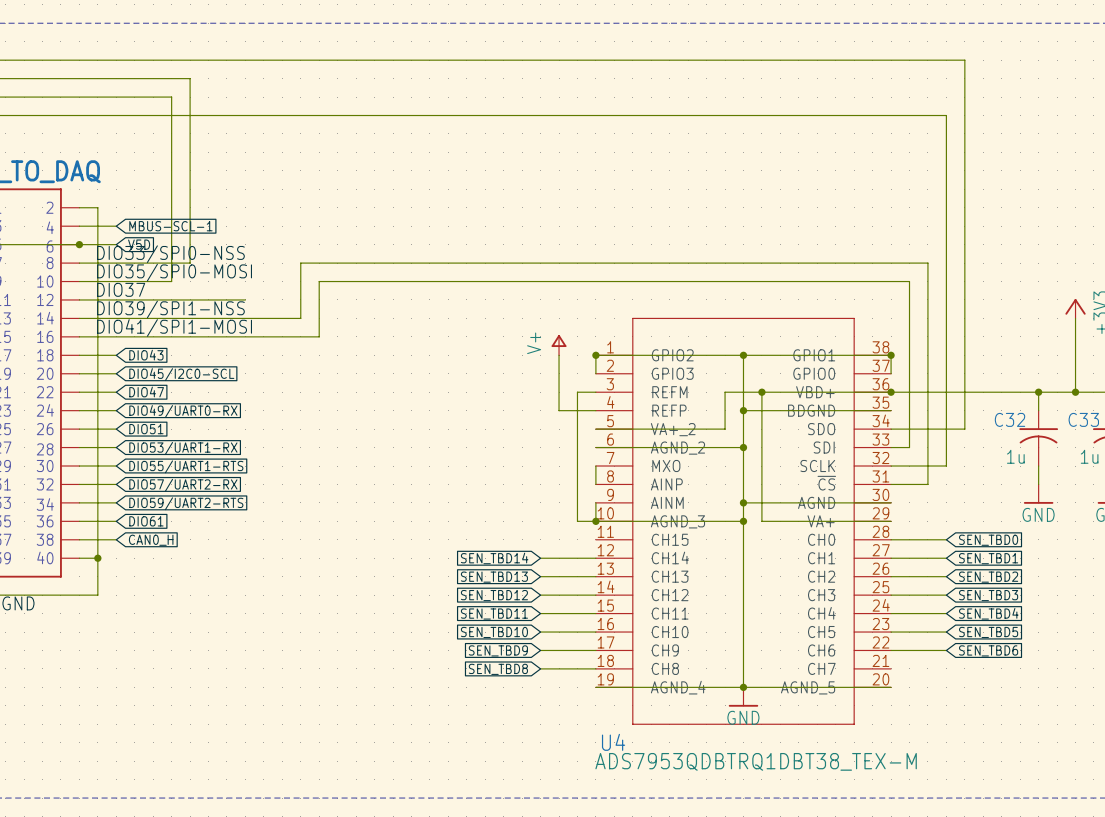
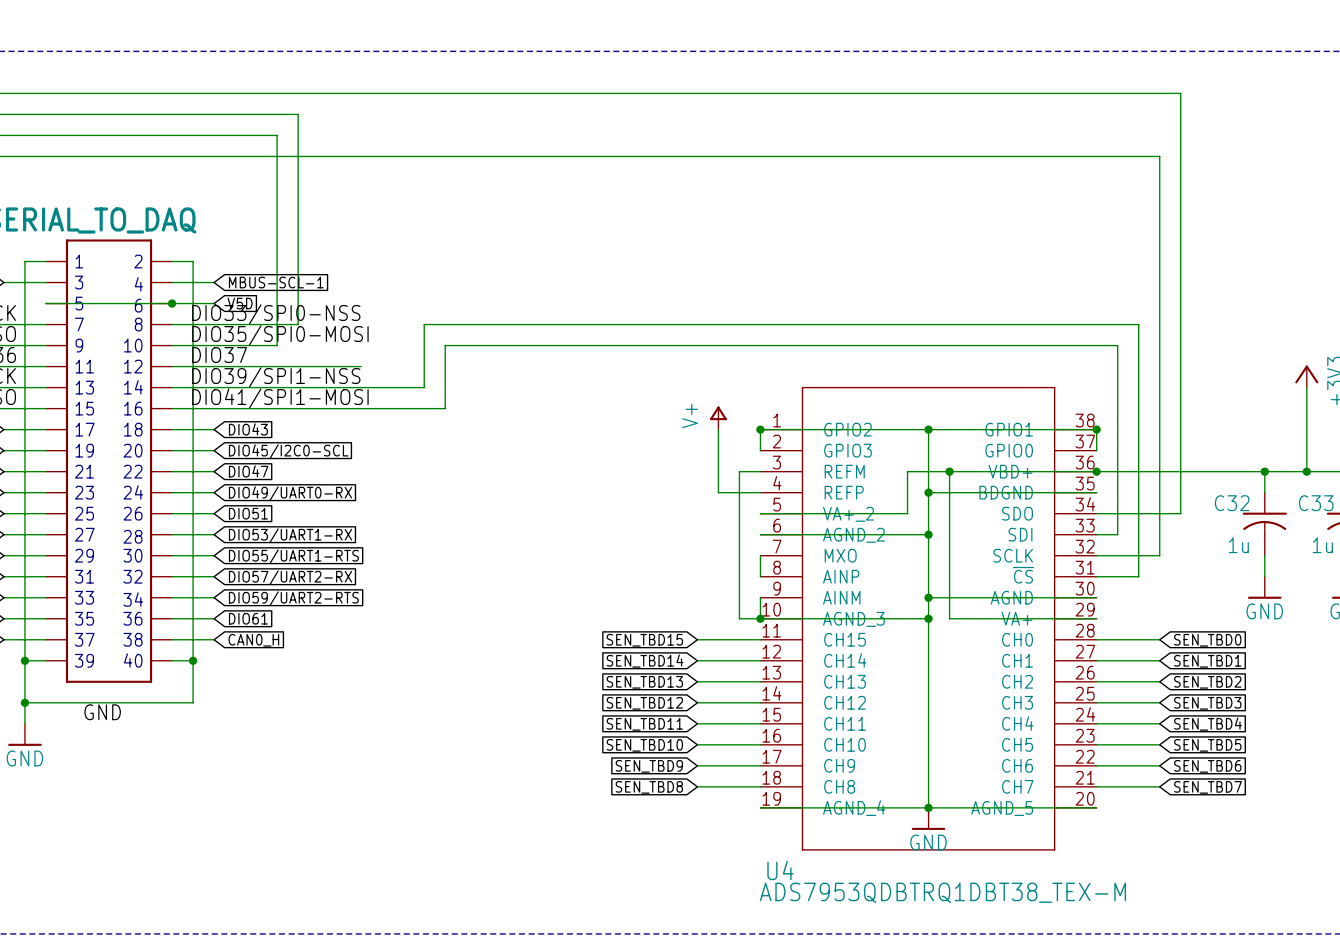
wire: none -> (697, 639) (760, 639)
global label: none -> SEN_TBD15 (644, 640)
wire: none -> (1096, 786) (1159, 786)
global label: none -> SEN_TBD7 (1208, 787)

